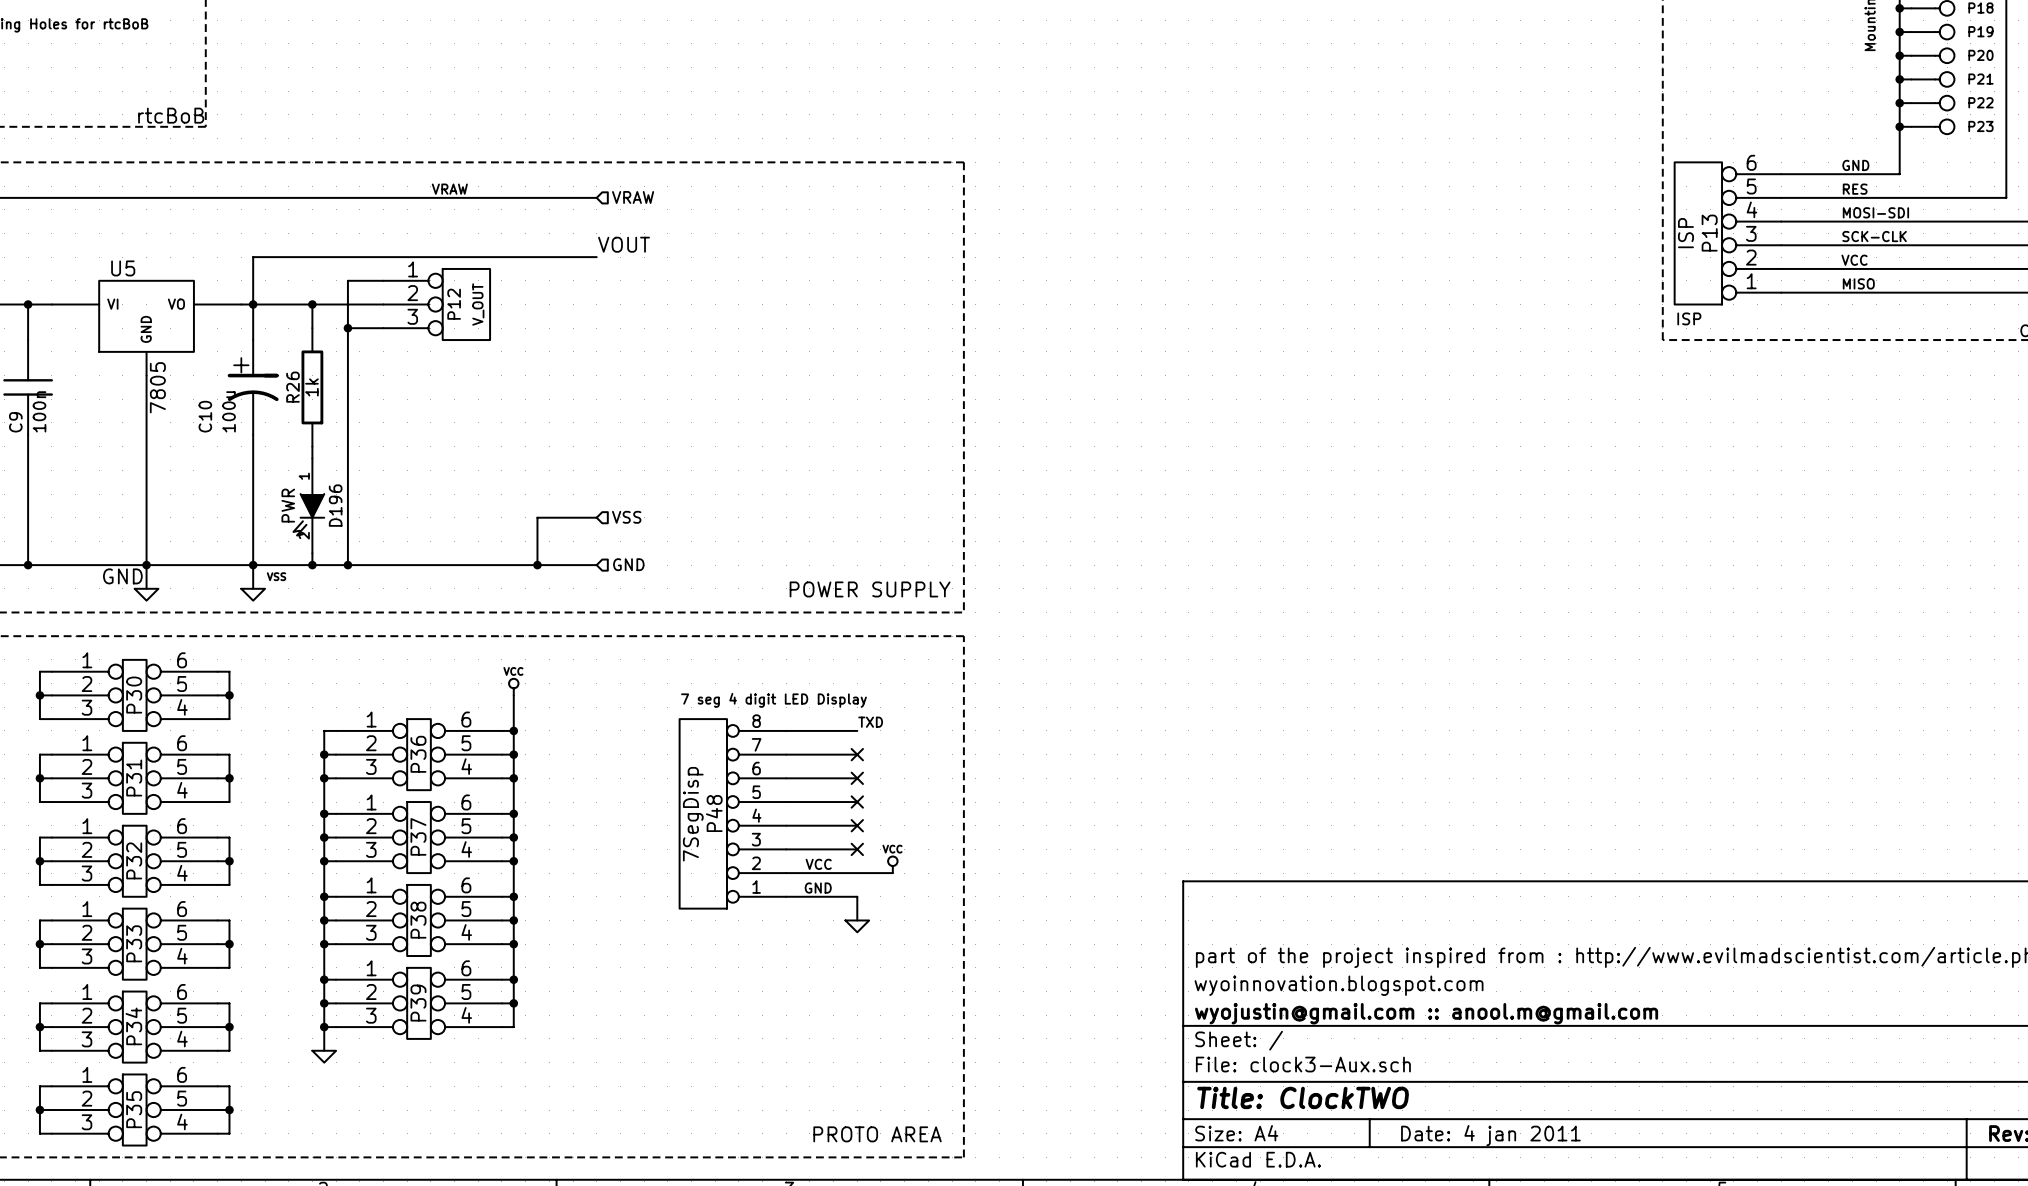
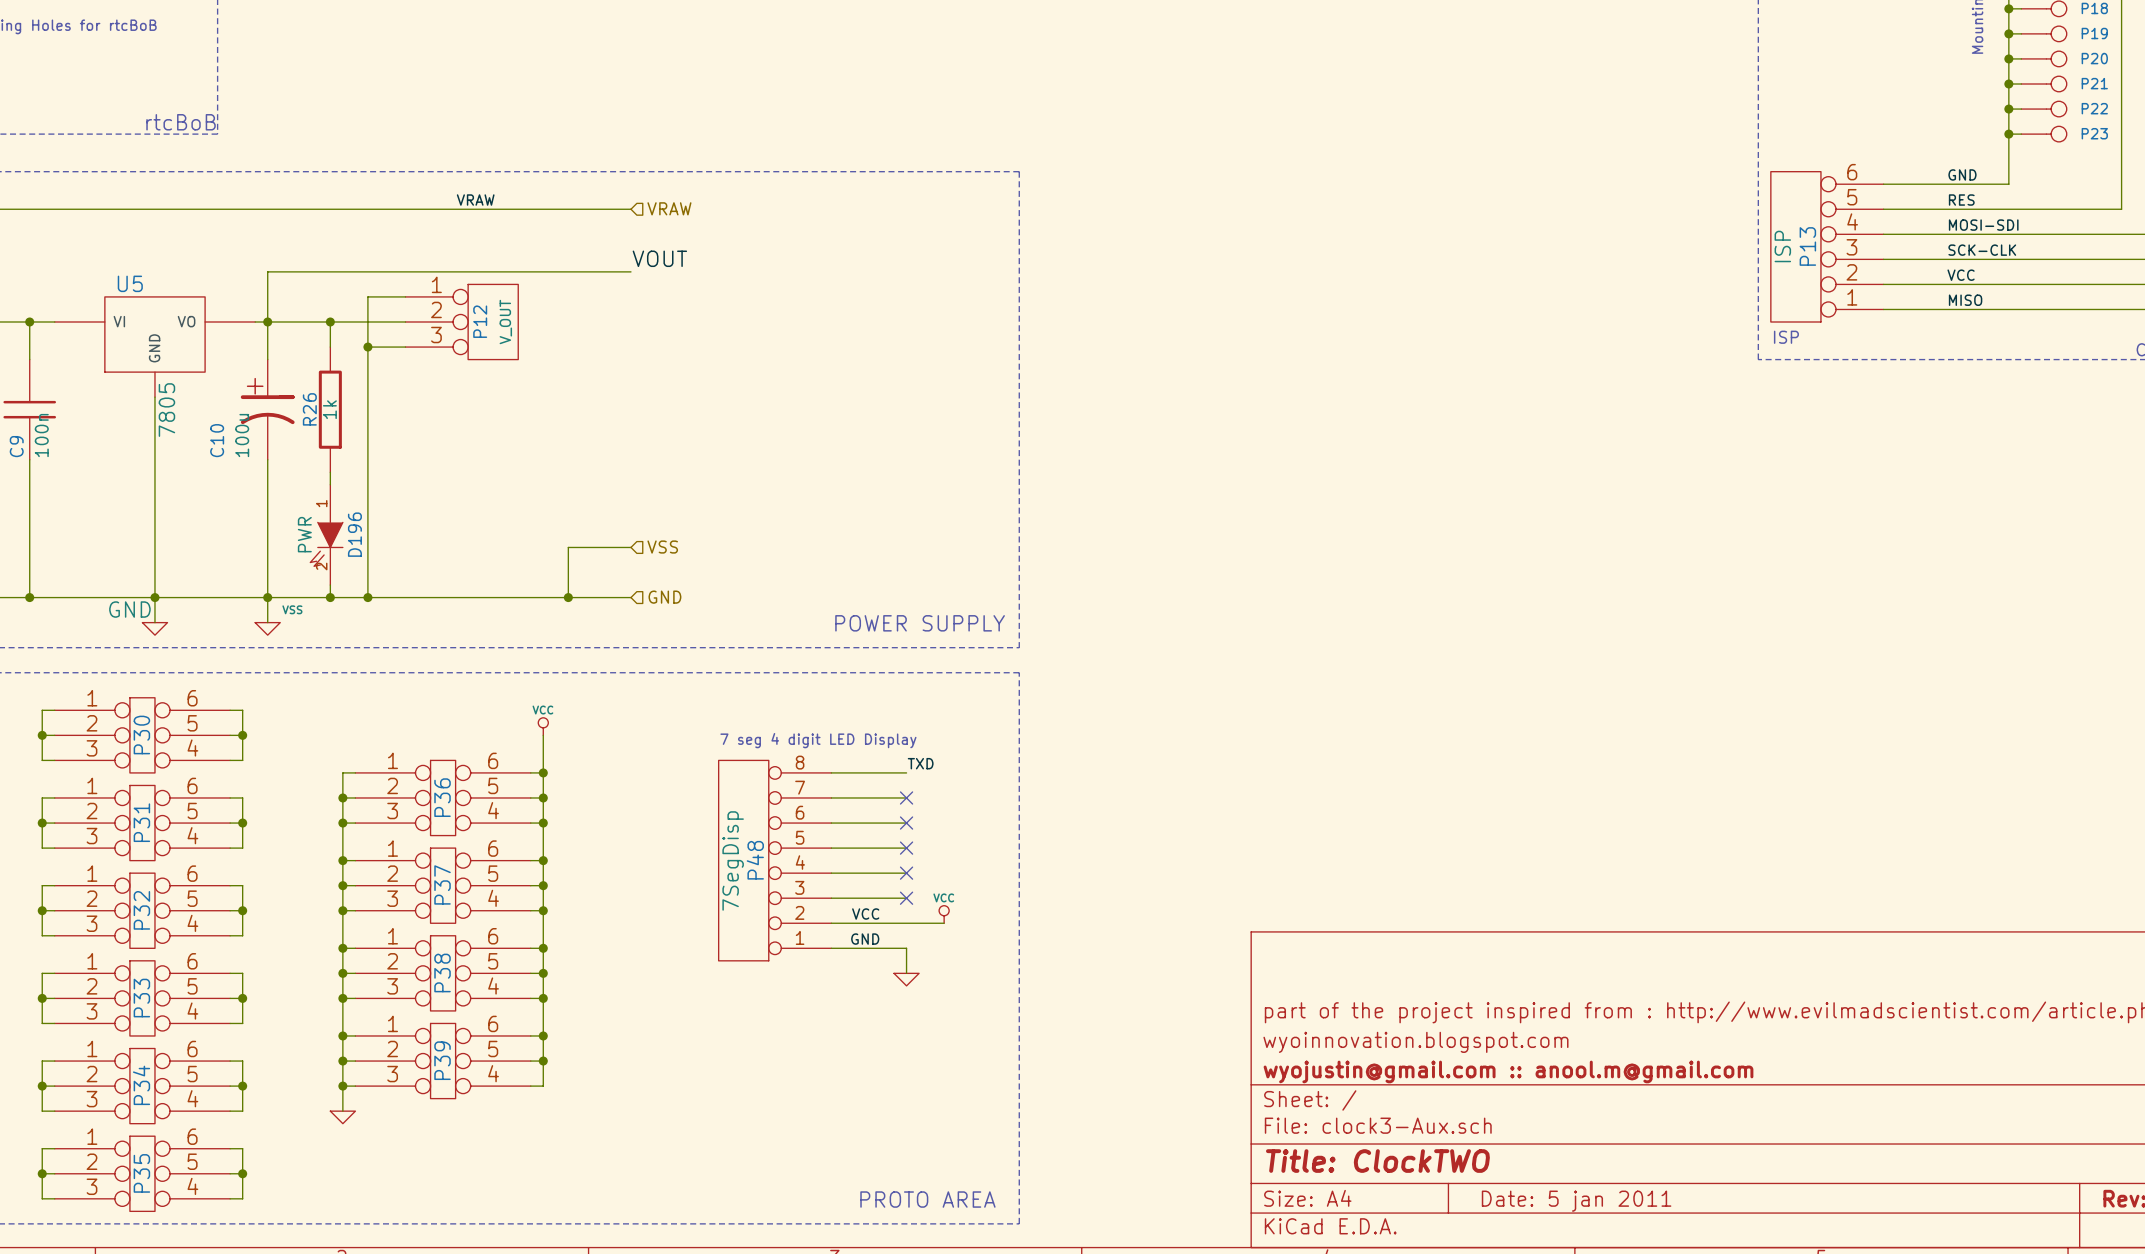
title block: Date: 4 jan 2011 (1490, 1135) -> Date: 5 jan 2011 (1576, 1201)

